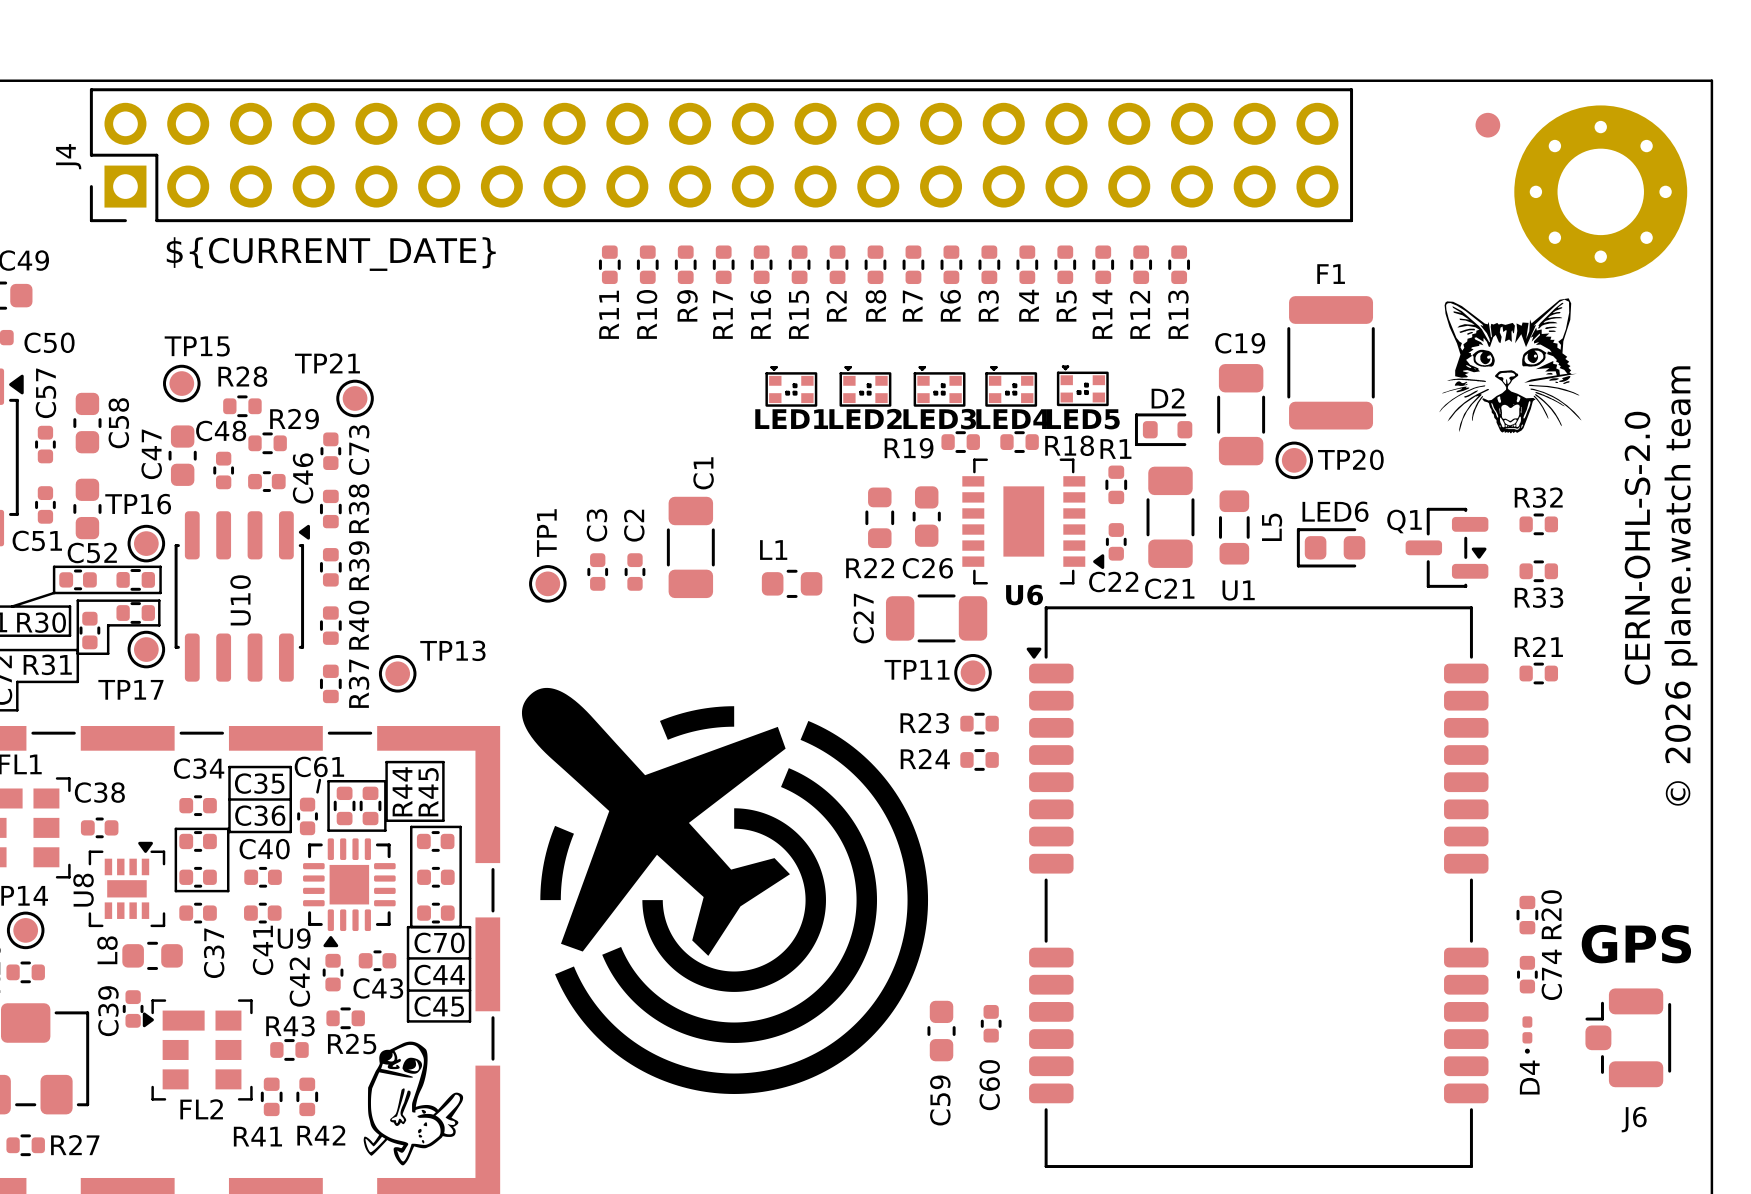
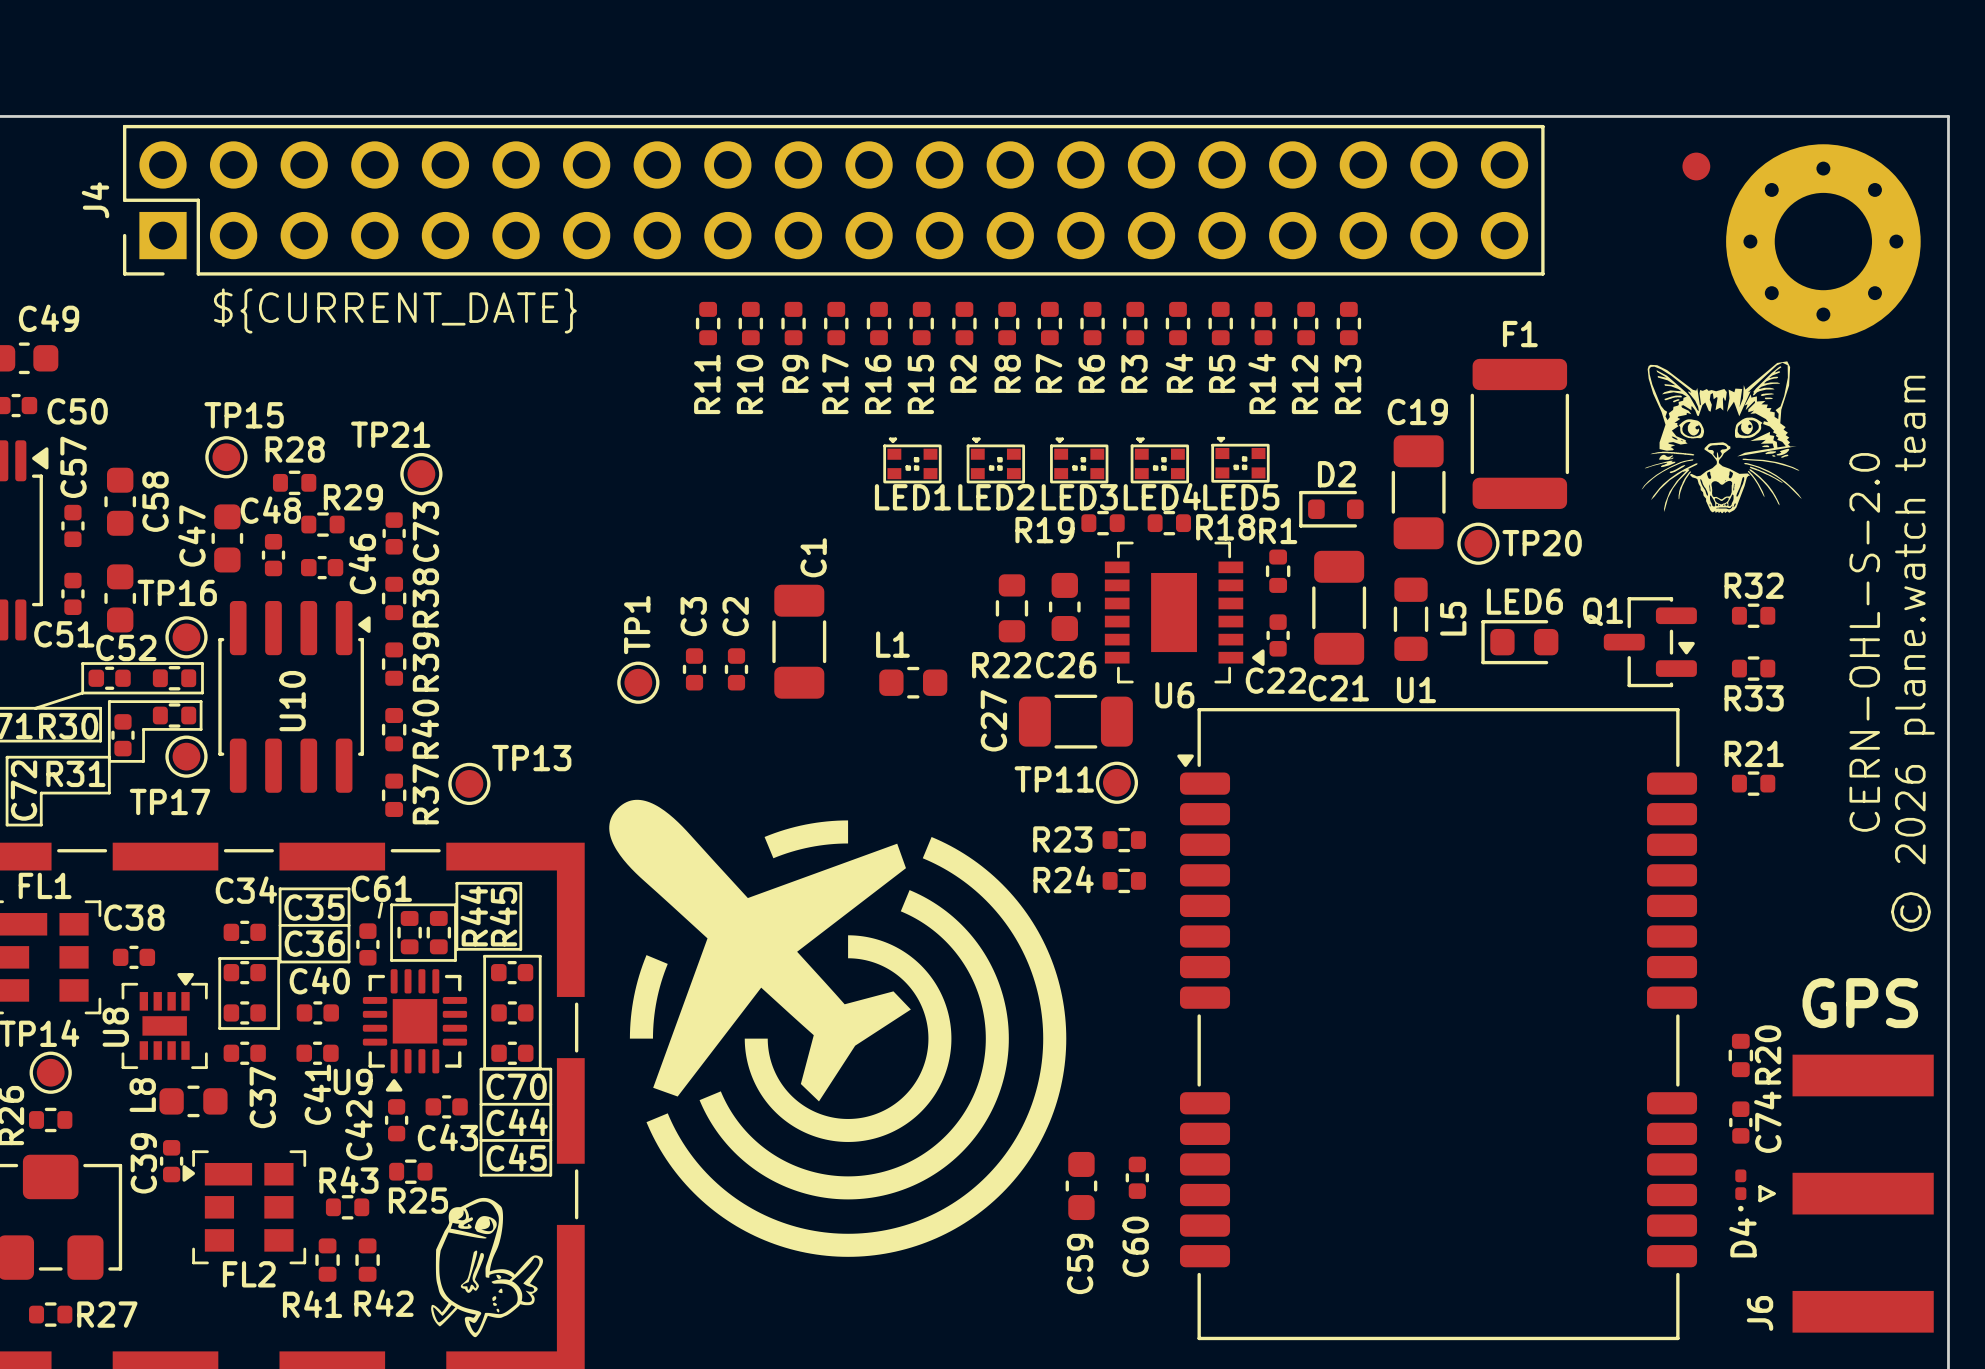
text position: GPS (1636, 944) -> GPS (1860, 1003)
J6 footprint: [1585, 988, 1672, 1088] -> [1758, 1054, 1934, 1333]
J6 name position: J6 (1634, 1119) -> J6 (1760, 1313)

